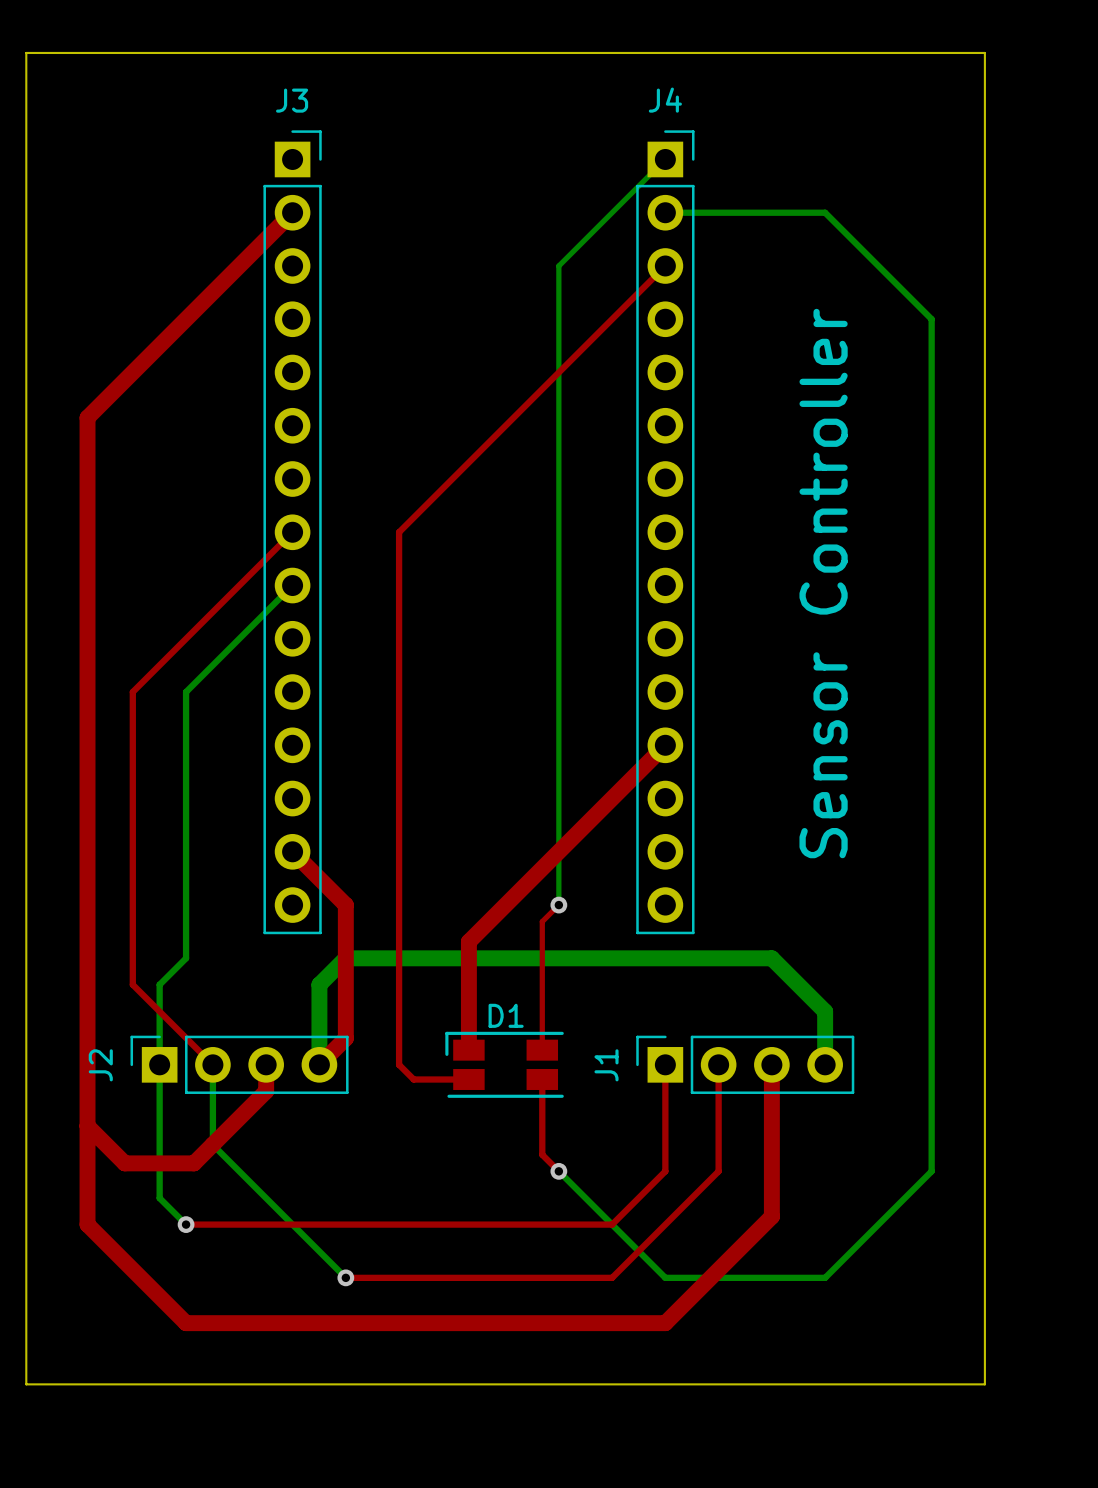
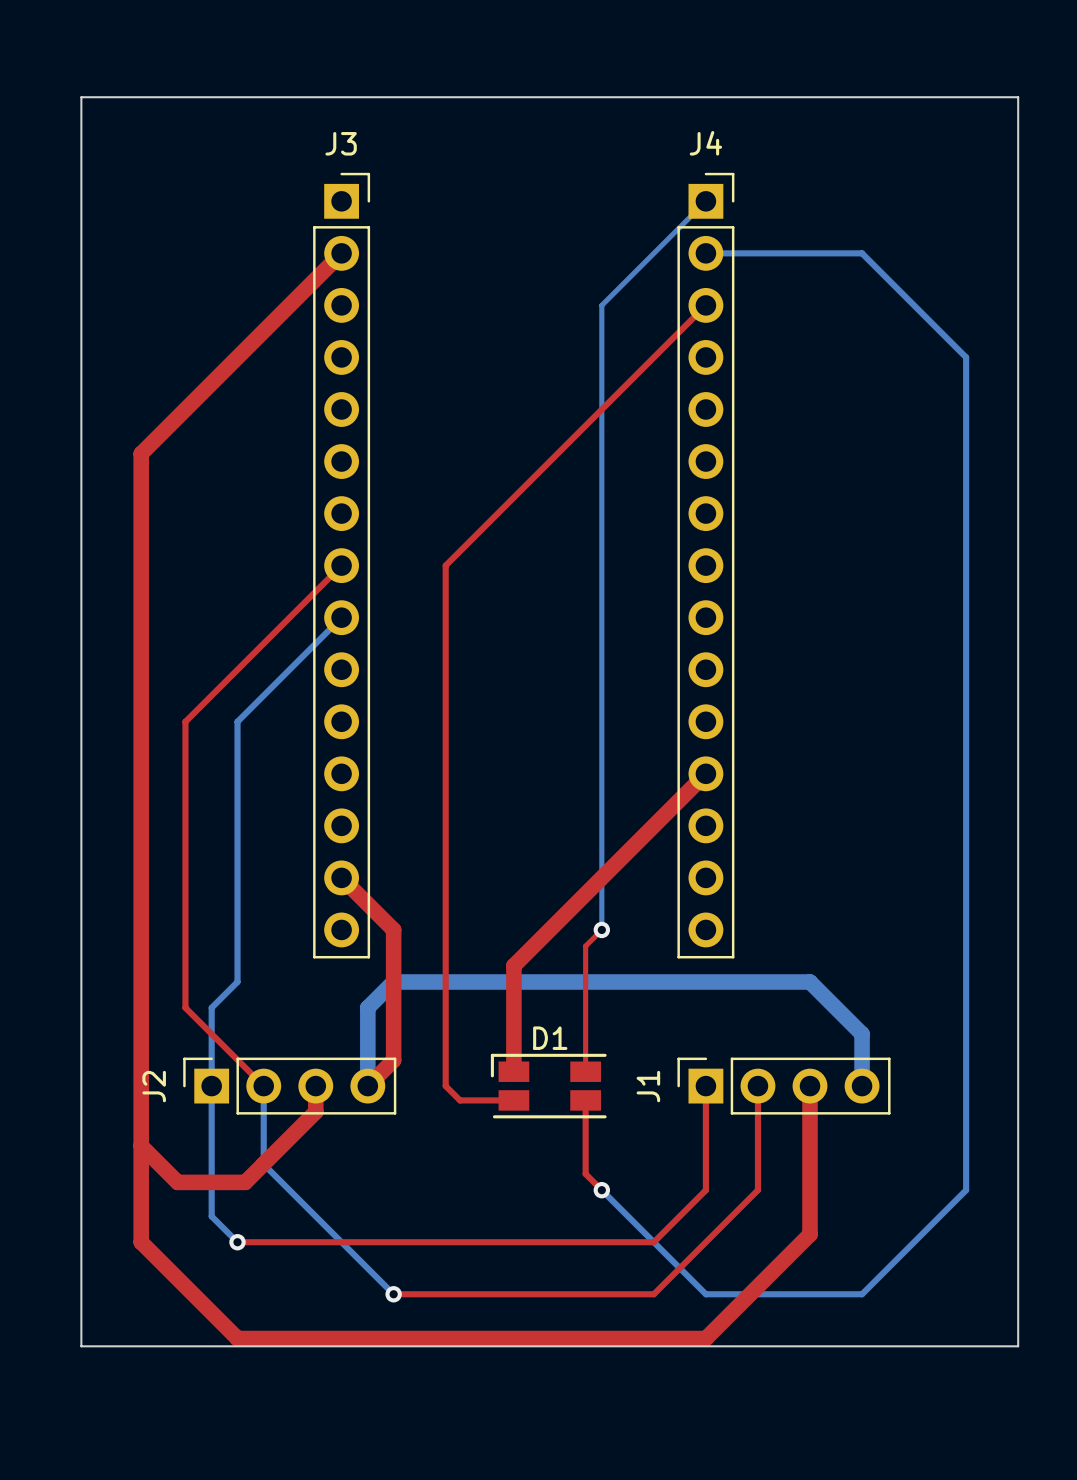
text: Sensor Controller (823, 583) -> none
board edge: (26, 1331) (26, 1384) (984, 1384) (984, 1331) -> (81, 1346) (1018, 1346)

